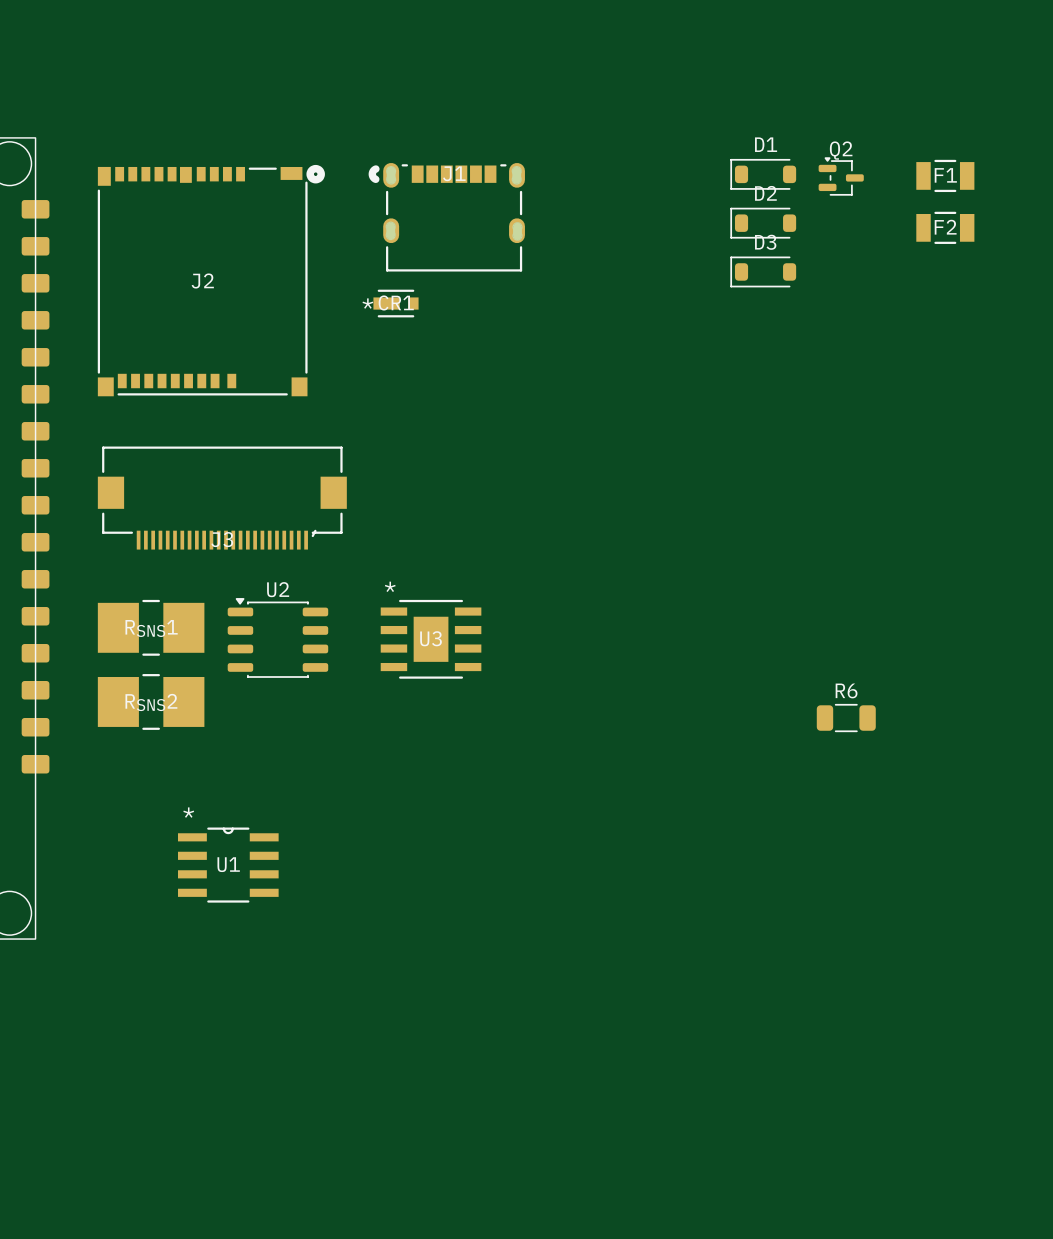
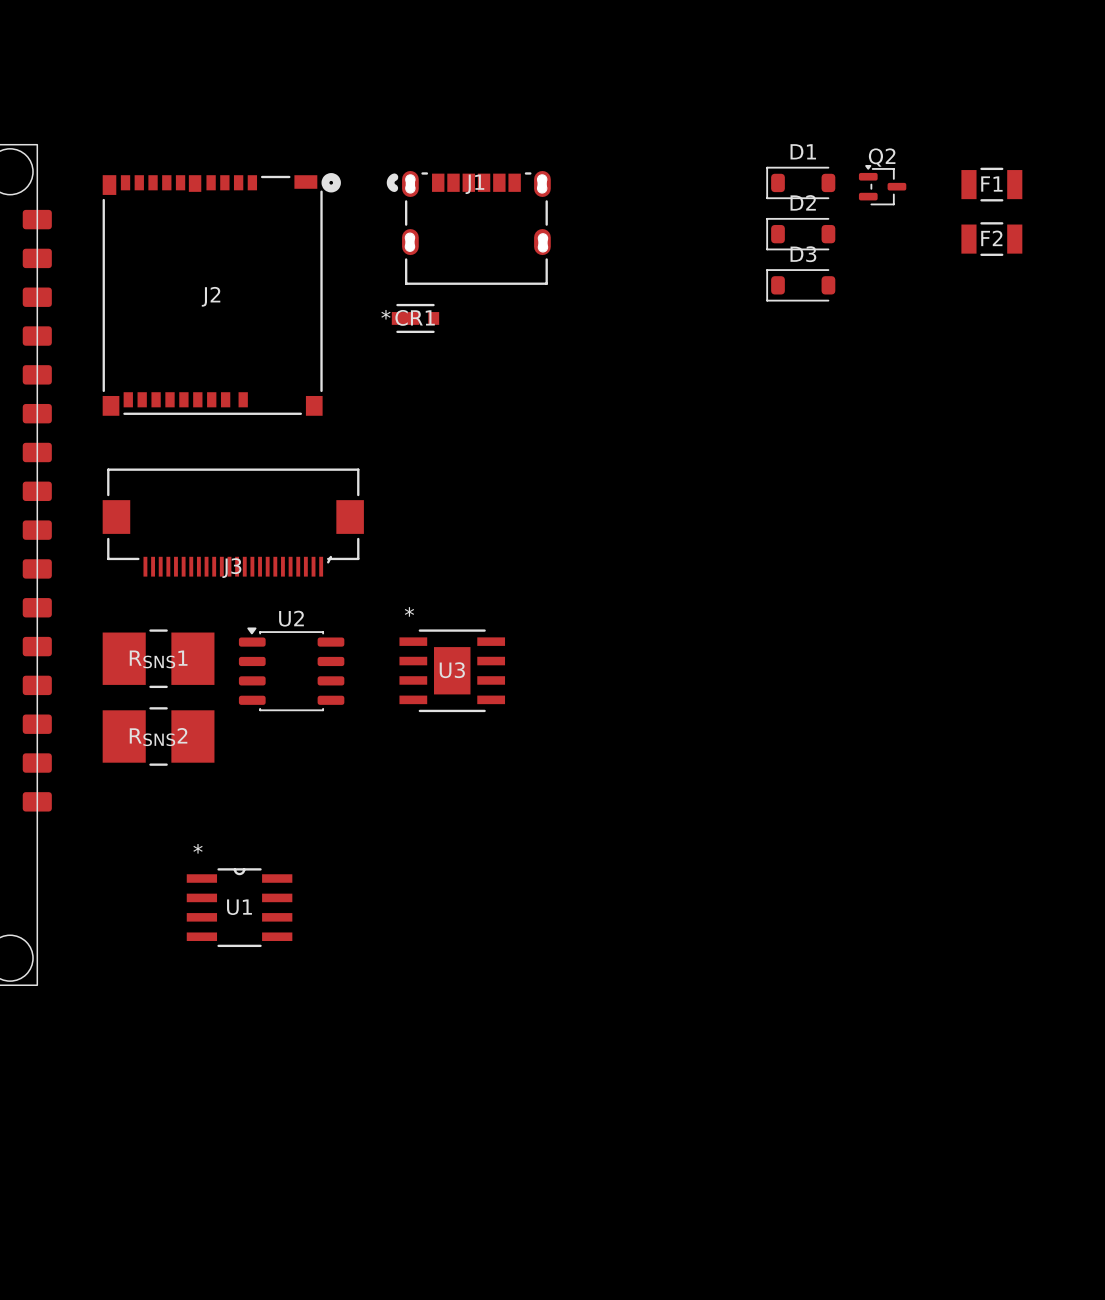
R6: (846, 718) -> none

